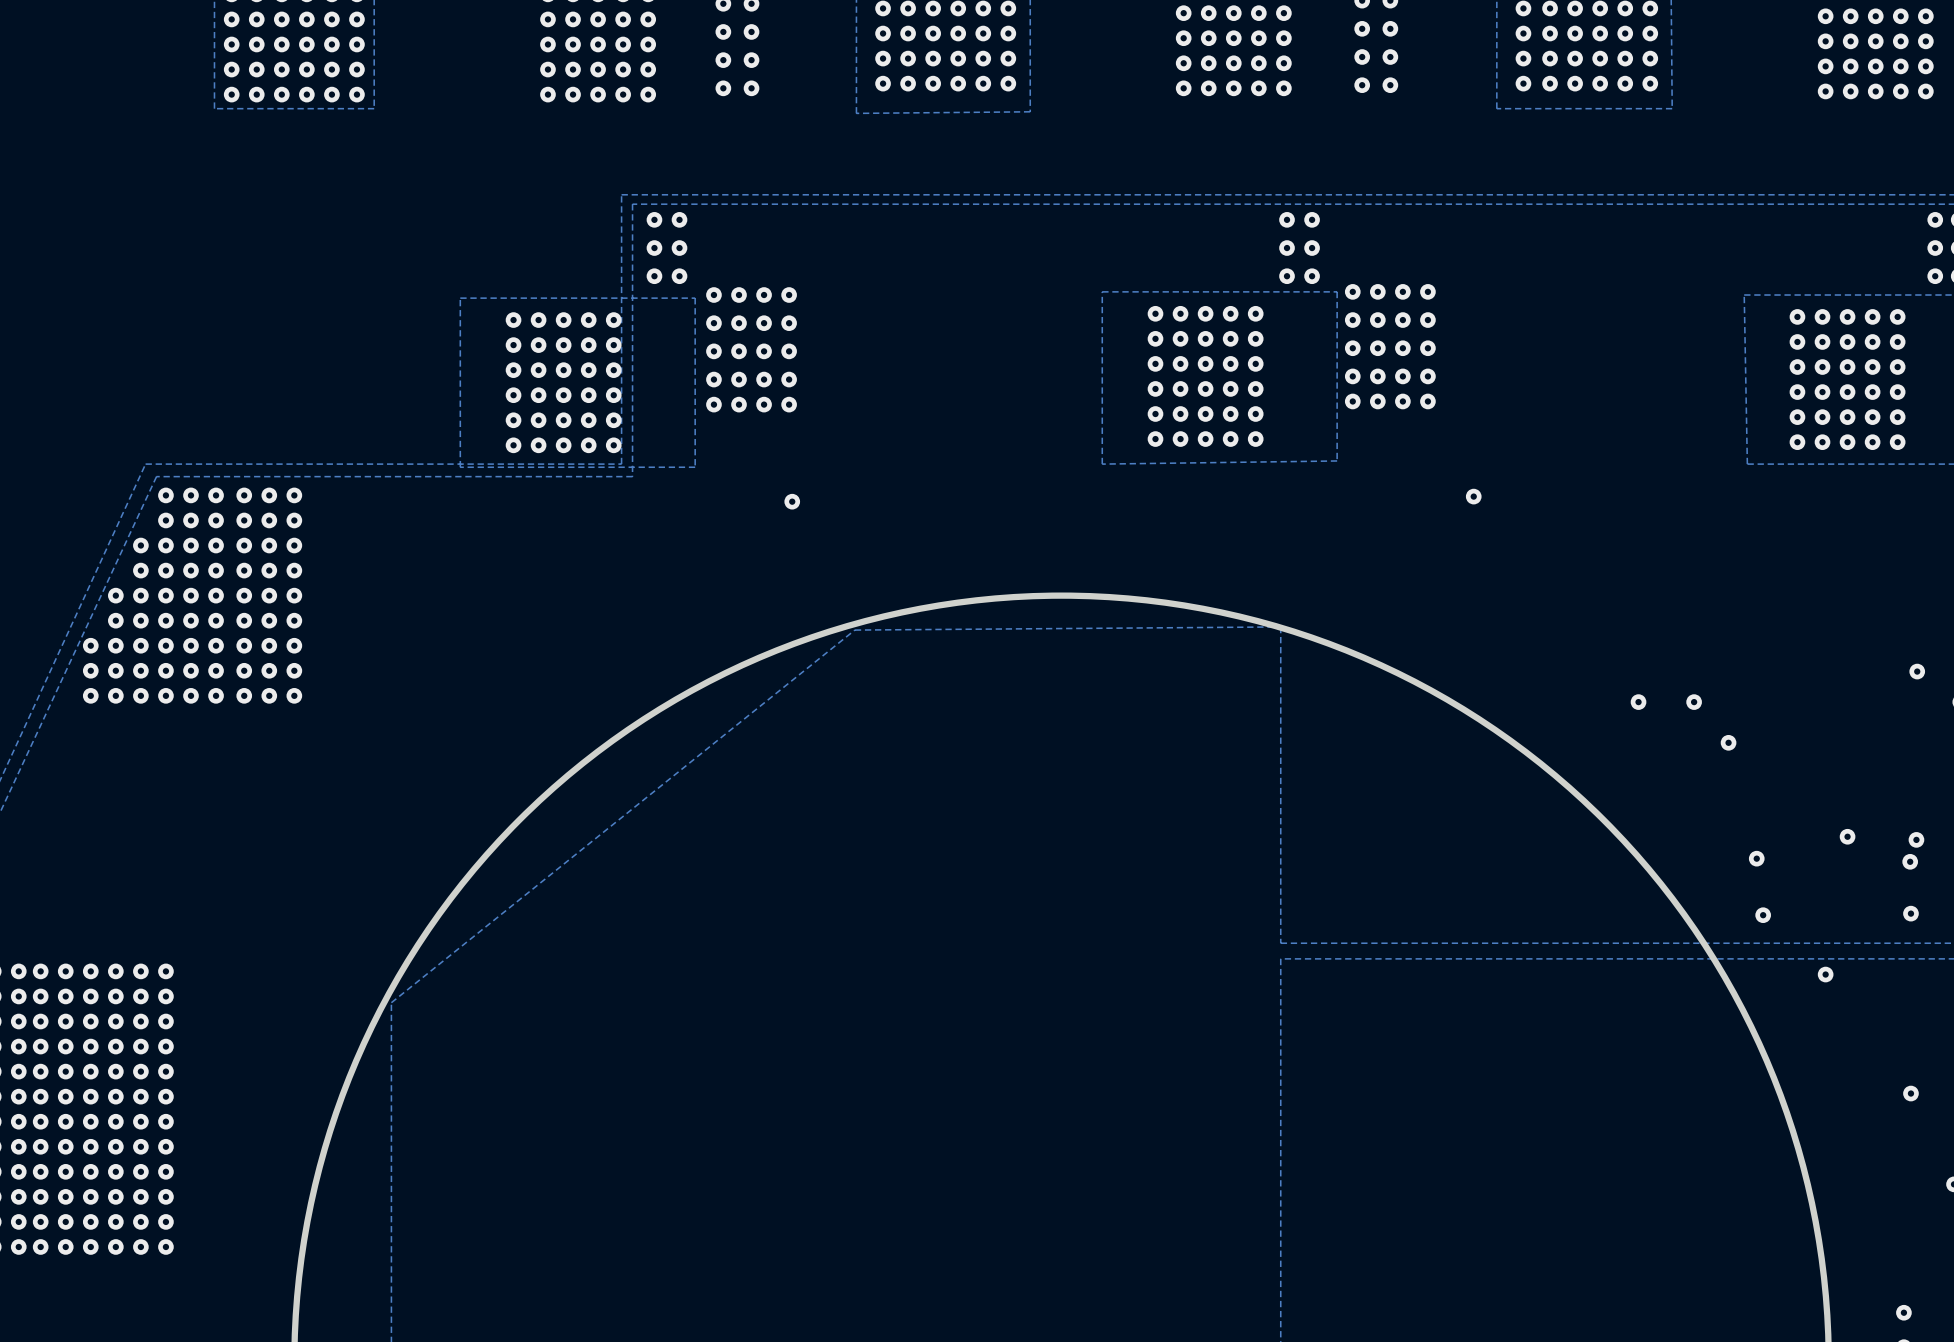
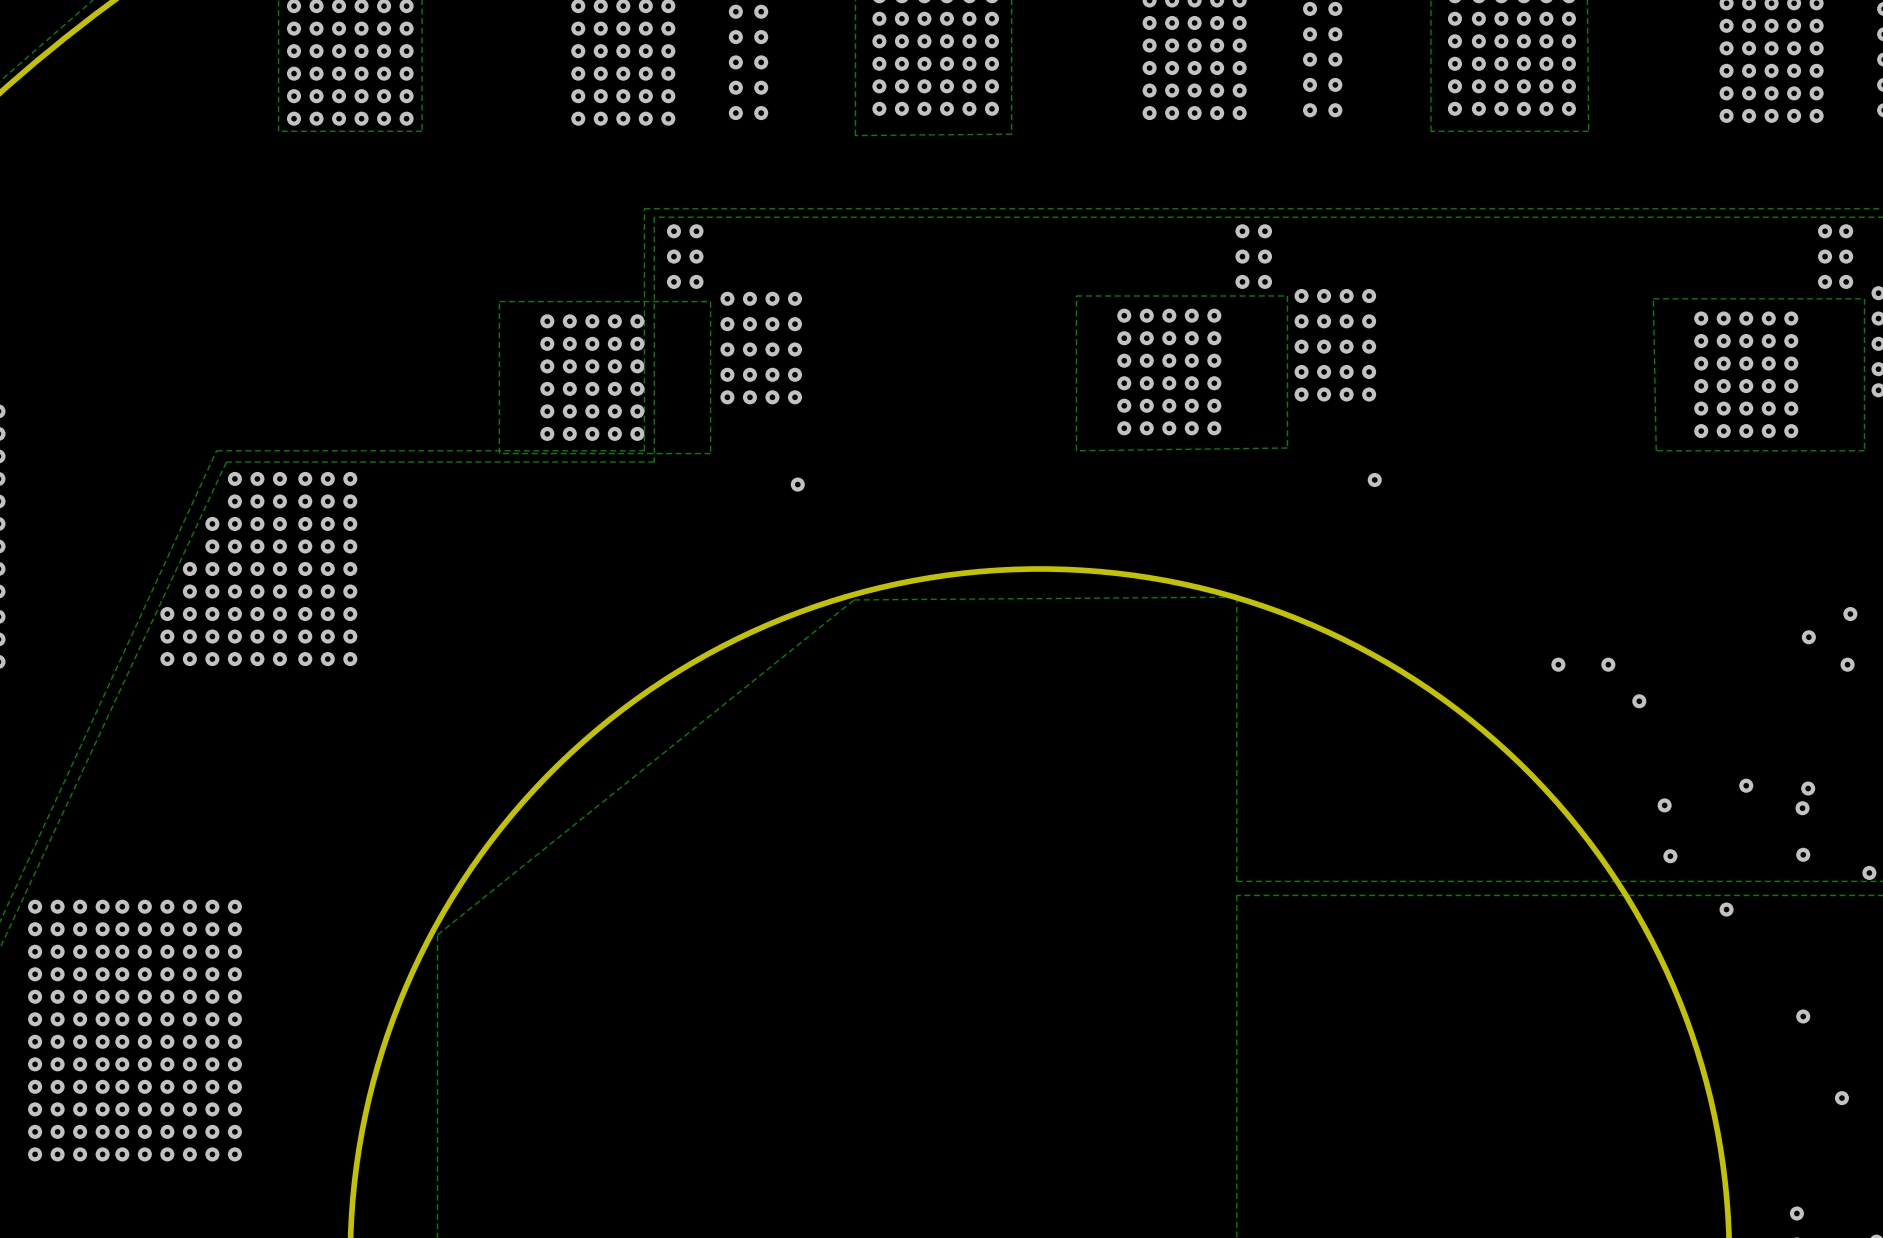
via position: (1473, 496) -> (1374, 479)

